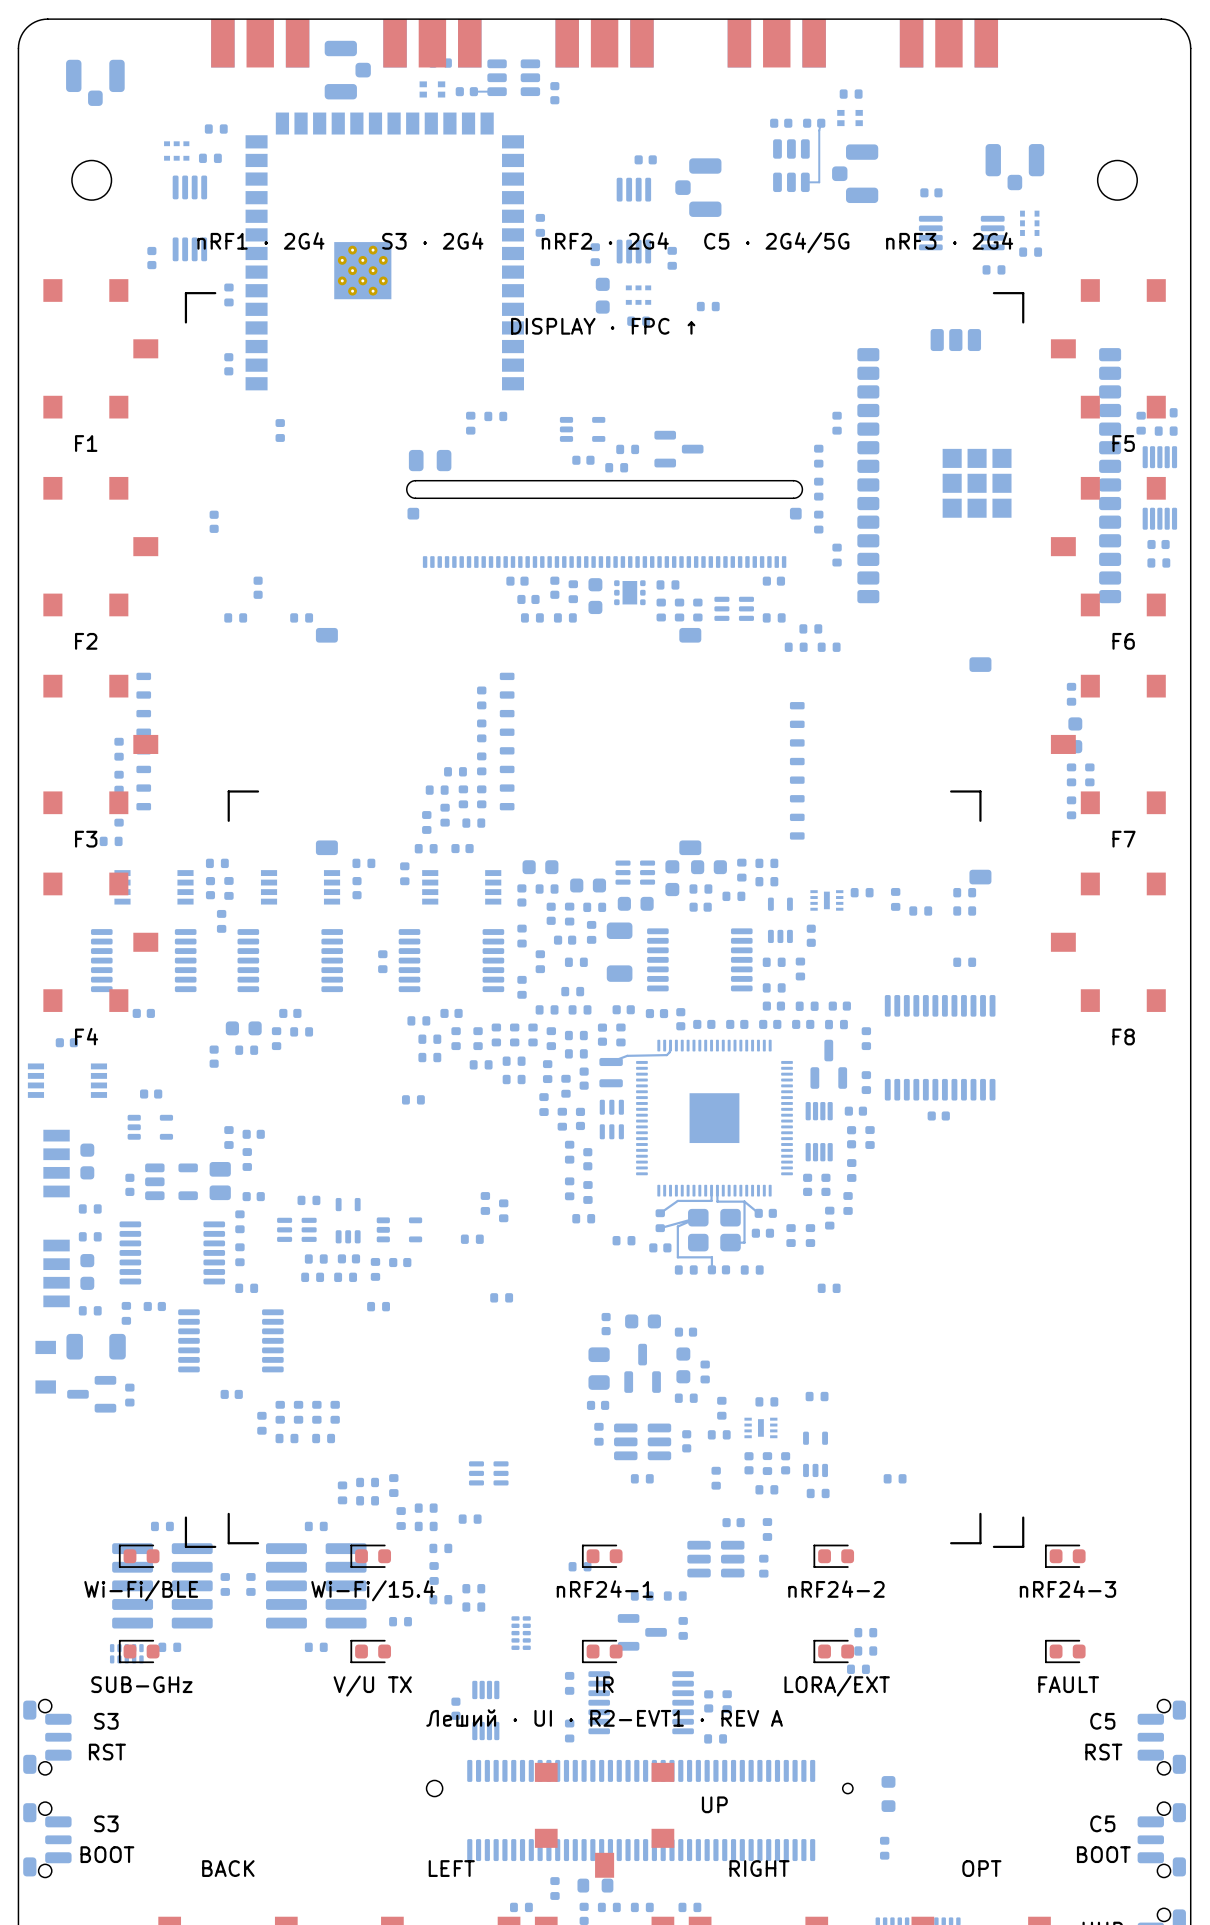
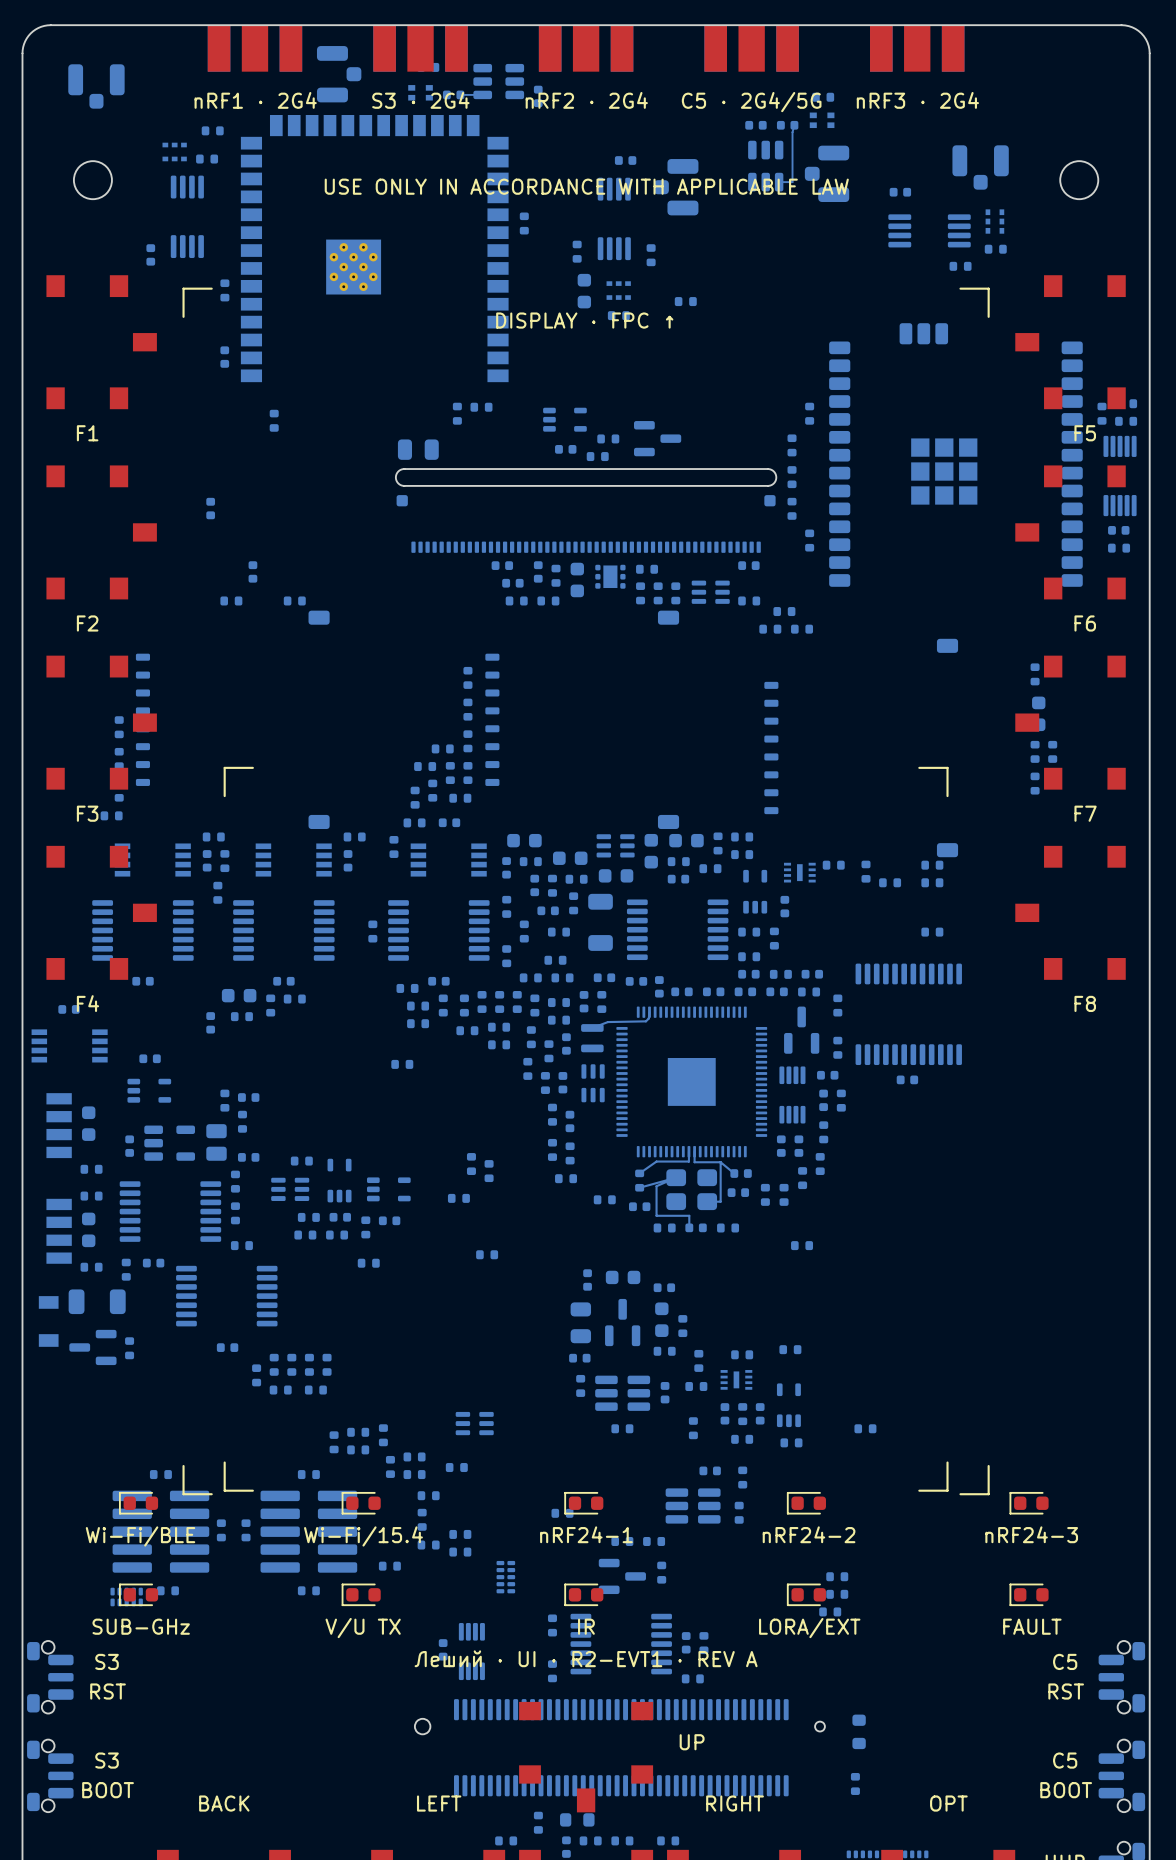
text: none -> USE ONLY IN ACCORDANCE WITH APPLICABLE LAW (586, 186)
text position: nRF1 · 2G4 (260, 240) -> nRF1 · 2G4 (255, 100)
text position: S3 · 2G4 (432, 240) -> S3 · 2G4 (420, 100)
text position: nRF2 · 2G4 (605, 240) -> nRF2 · 2G4 (586, 100)
text position: nRF3 · 2G4 (949, 240) -> nRF3 · 2G4 (917, 100)
text position: C5 · 2G4/5G (776, 242) -> C5 · 2G4/5G (751, 102)

